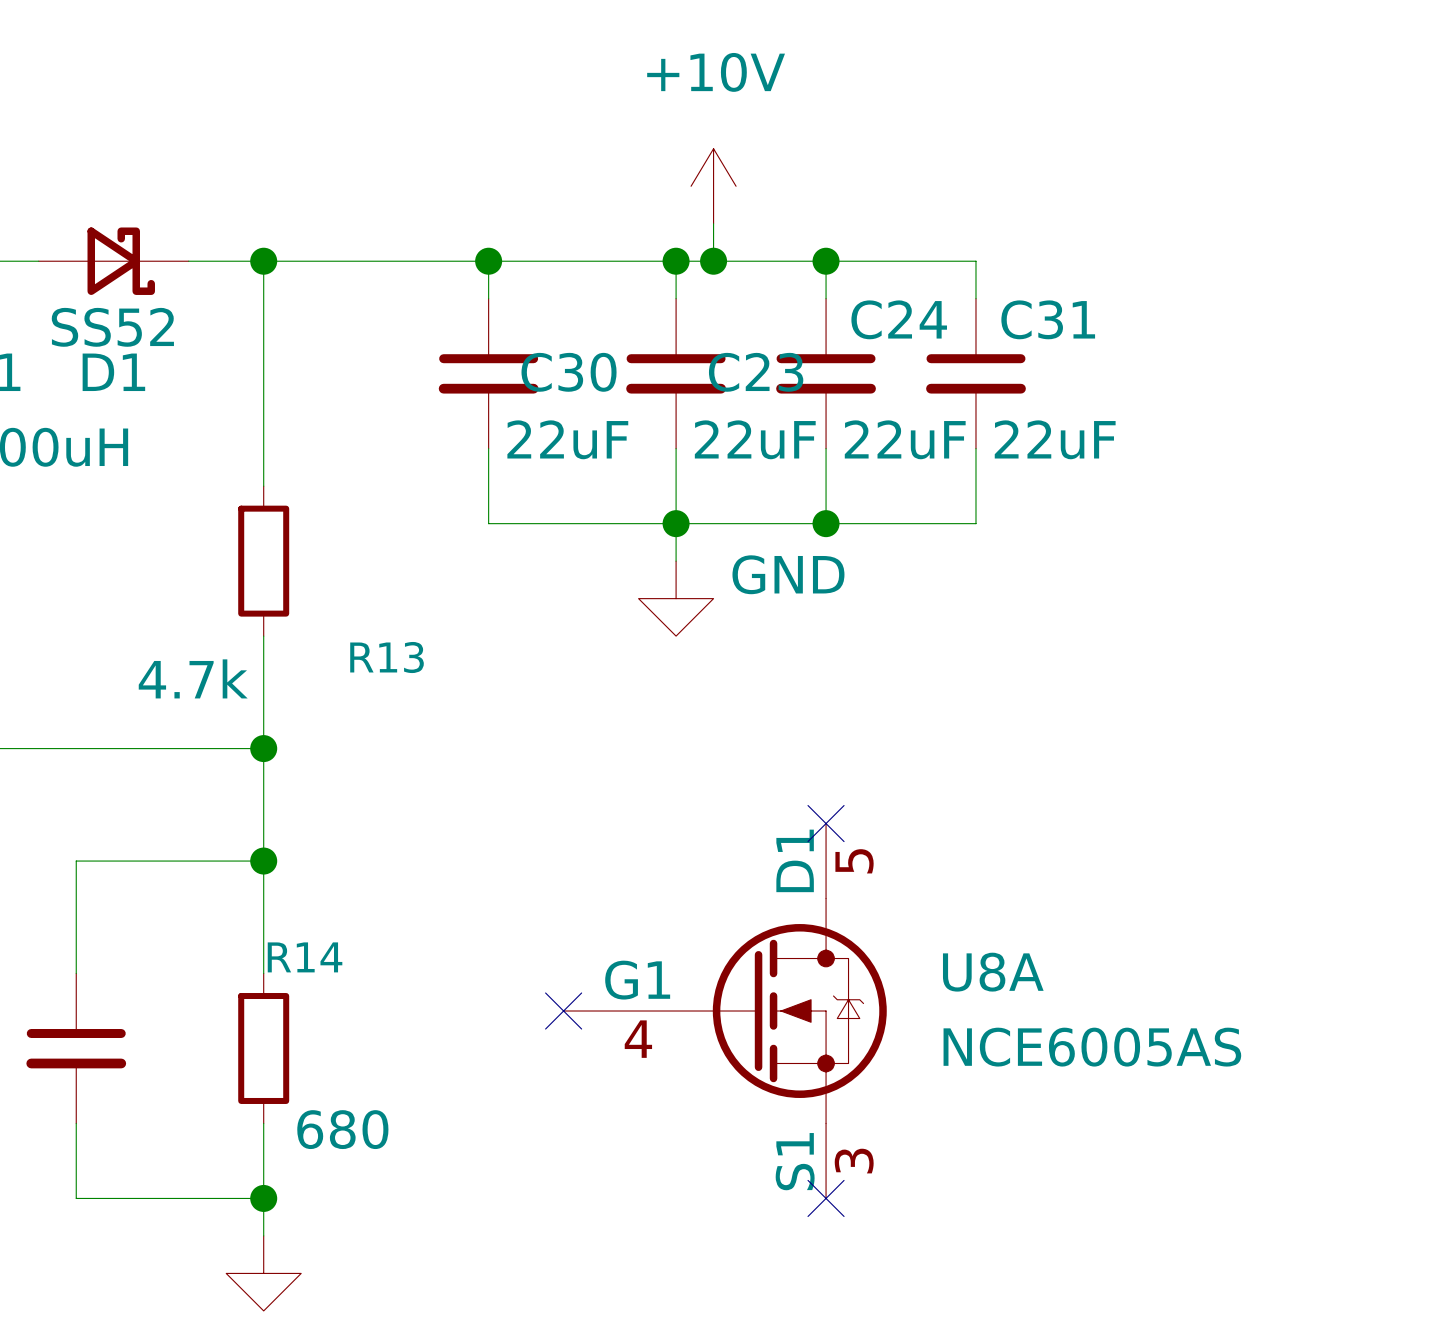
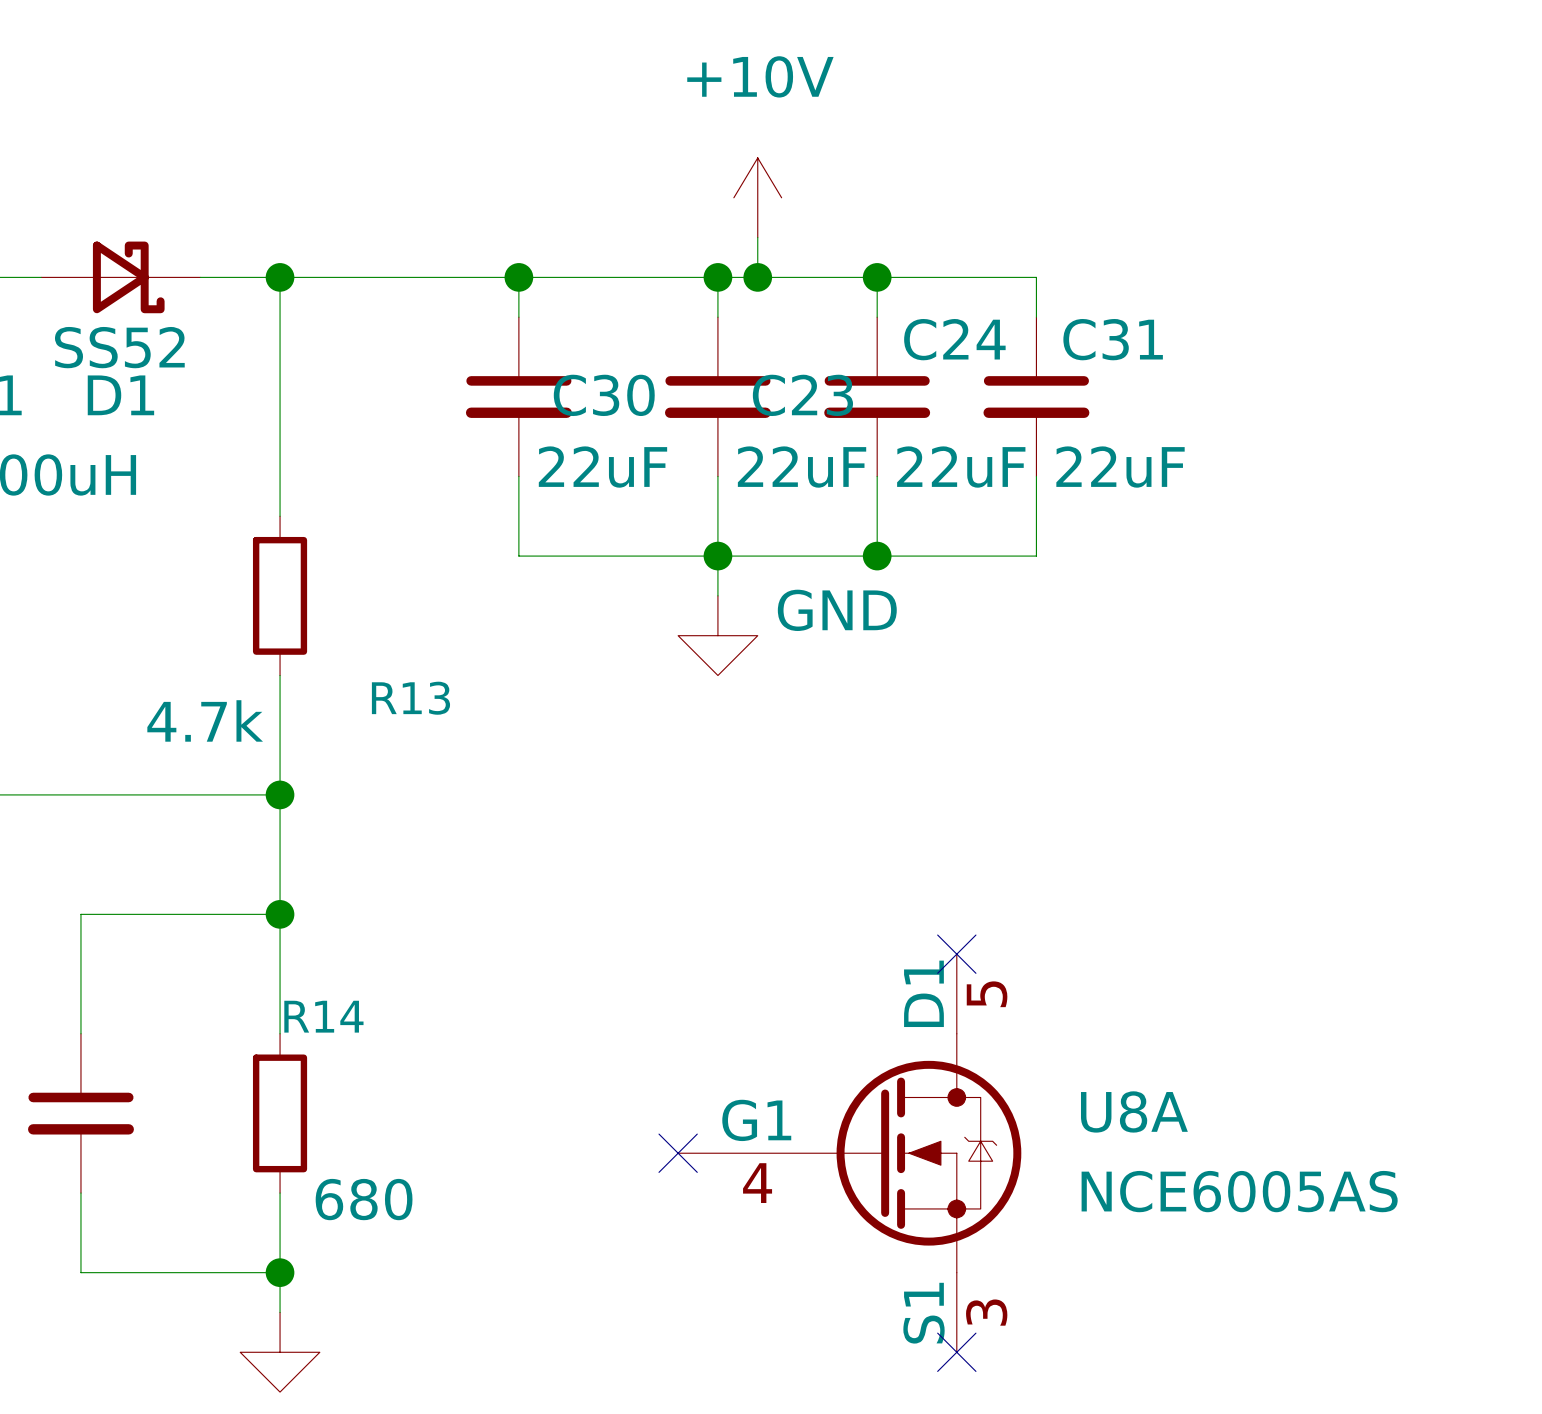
no-connect mark position: (826, 823) -> (956, 954)
no-connect mark position: (563, 1011) -> (678, 1153)
U8A position: (725, 1011) -> (849, 1153)
no-connect mark position: (826, 1198) -> (956, 1352)

